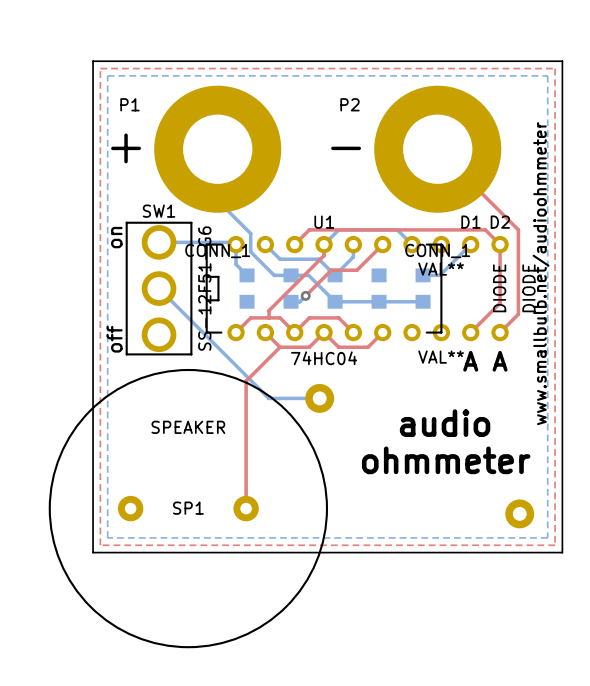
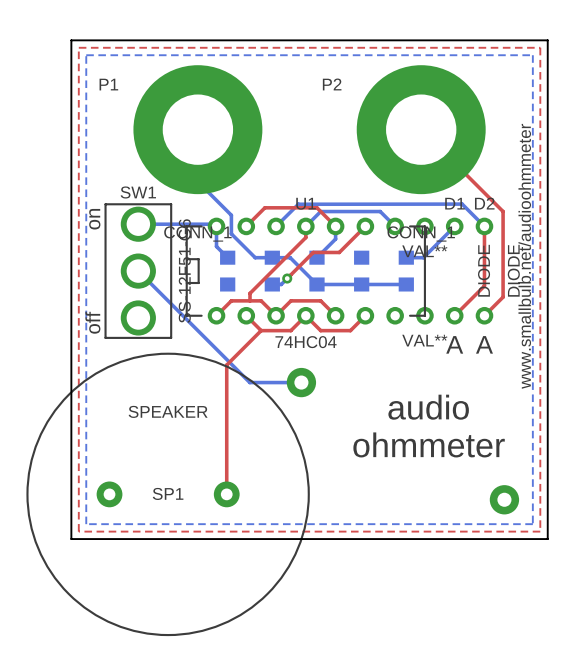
text: + (126, 148) -> none
text: - (346, 148) -> none
bottom track: (265, 244) (280, 259) (318, 259) (335, 275) -> none
top track: none -> (246, 226) (264, 207) (316, 207) (335, 226)
bottom track: none -> (276, 226) (298, 204) (462, 204) (484, 226)
top track: (294, 244) (309, 229) (485, 229) (500, 244) -> none

